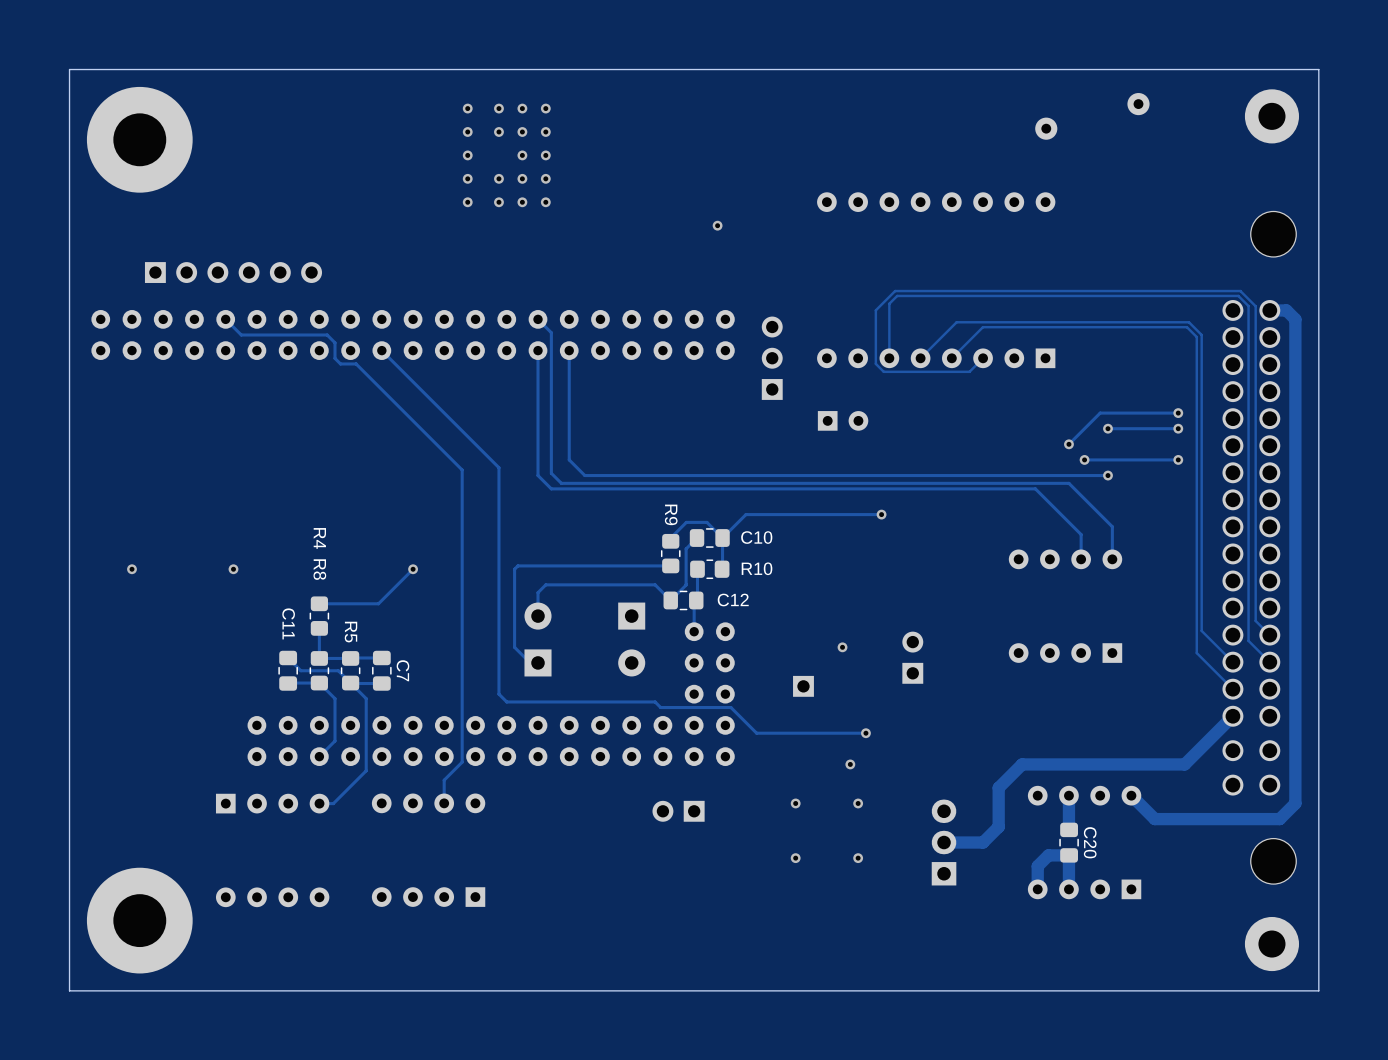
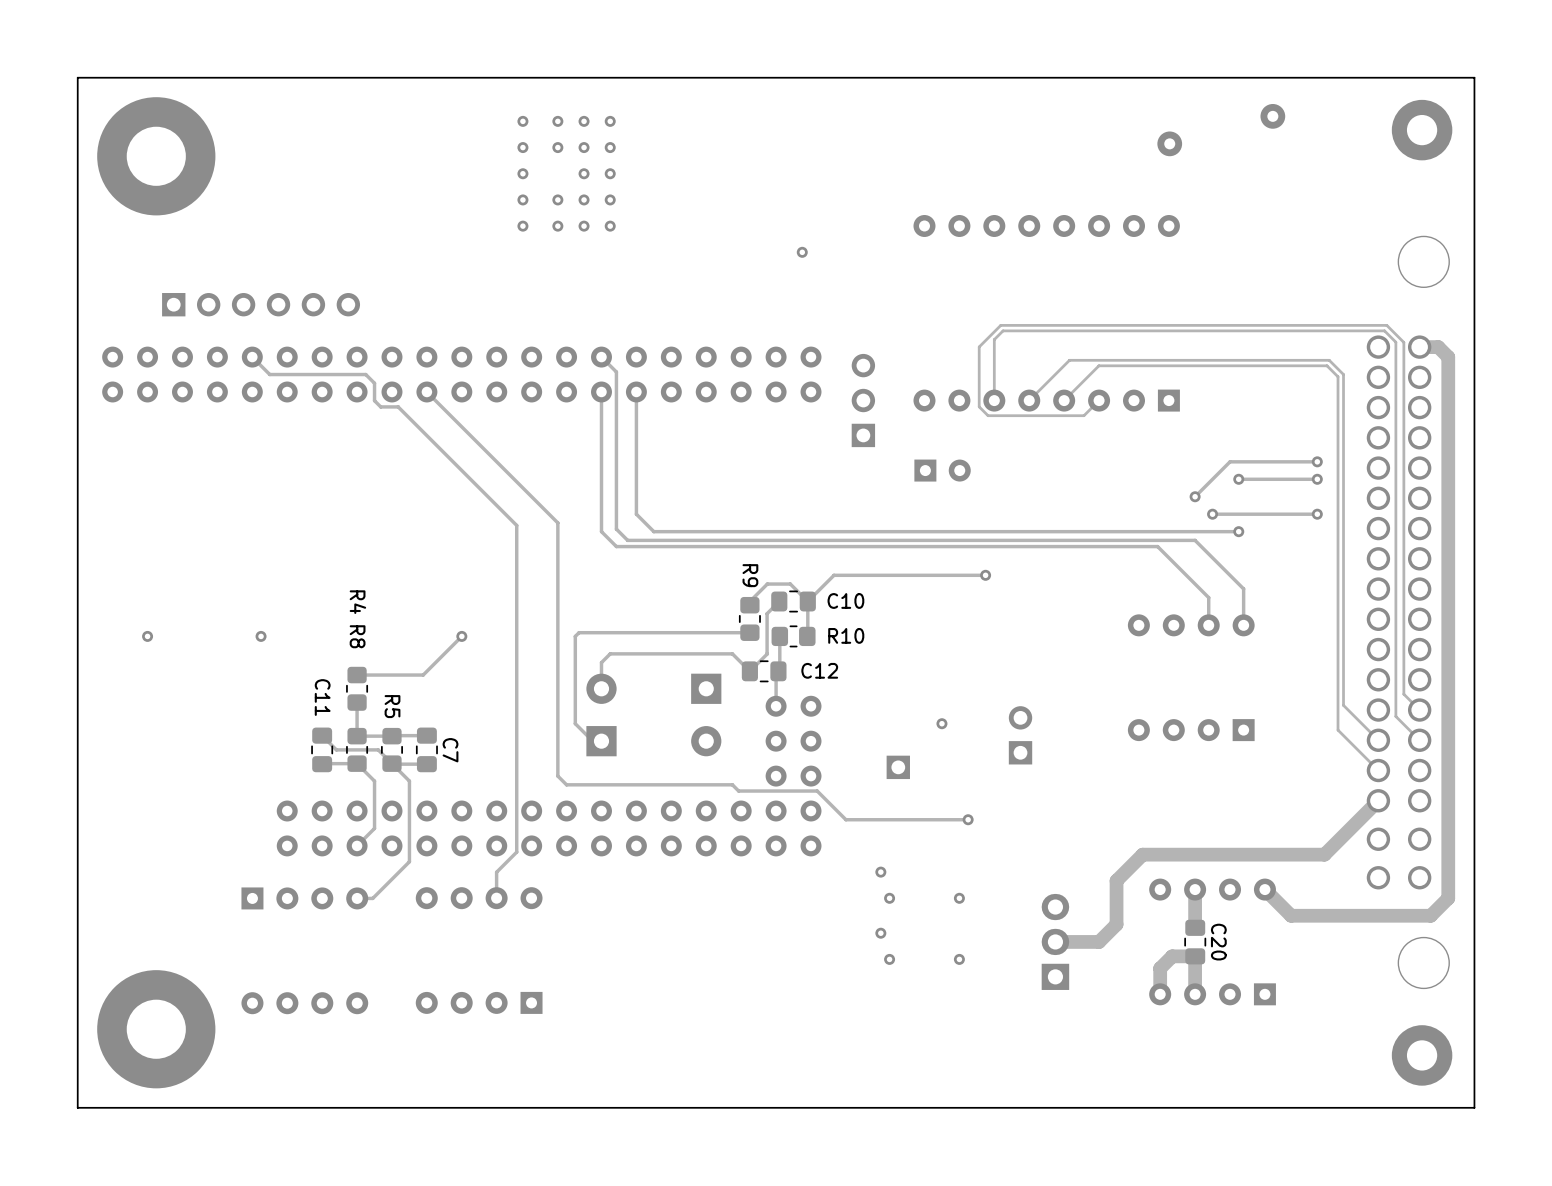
via: (850, 764) -> none
via: none -> (880, 872)
part: (678, 811) -> none
via: none -> (880, 933)

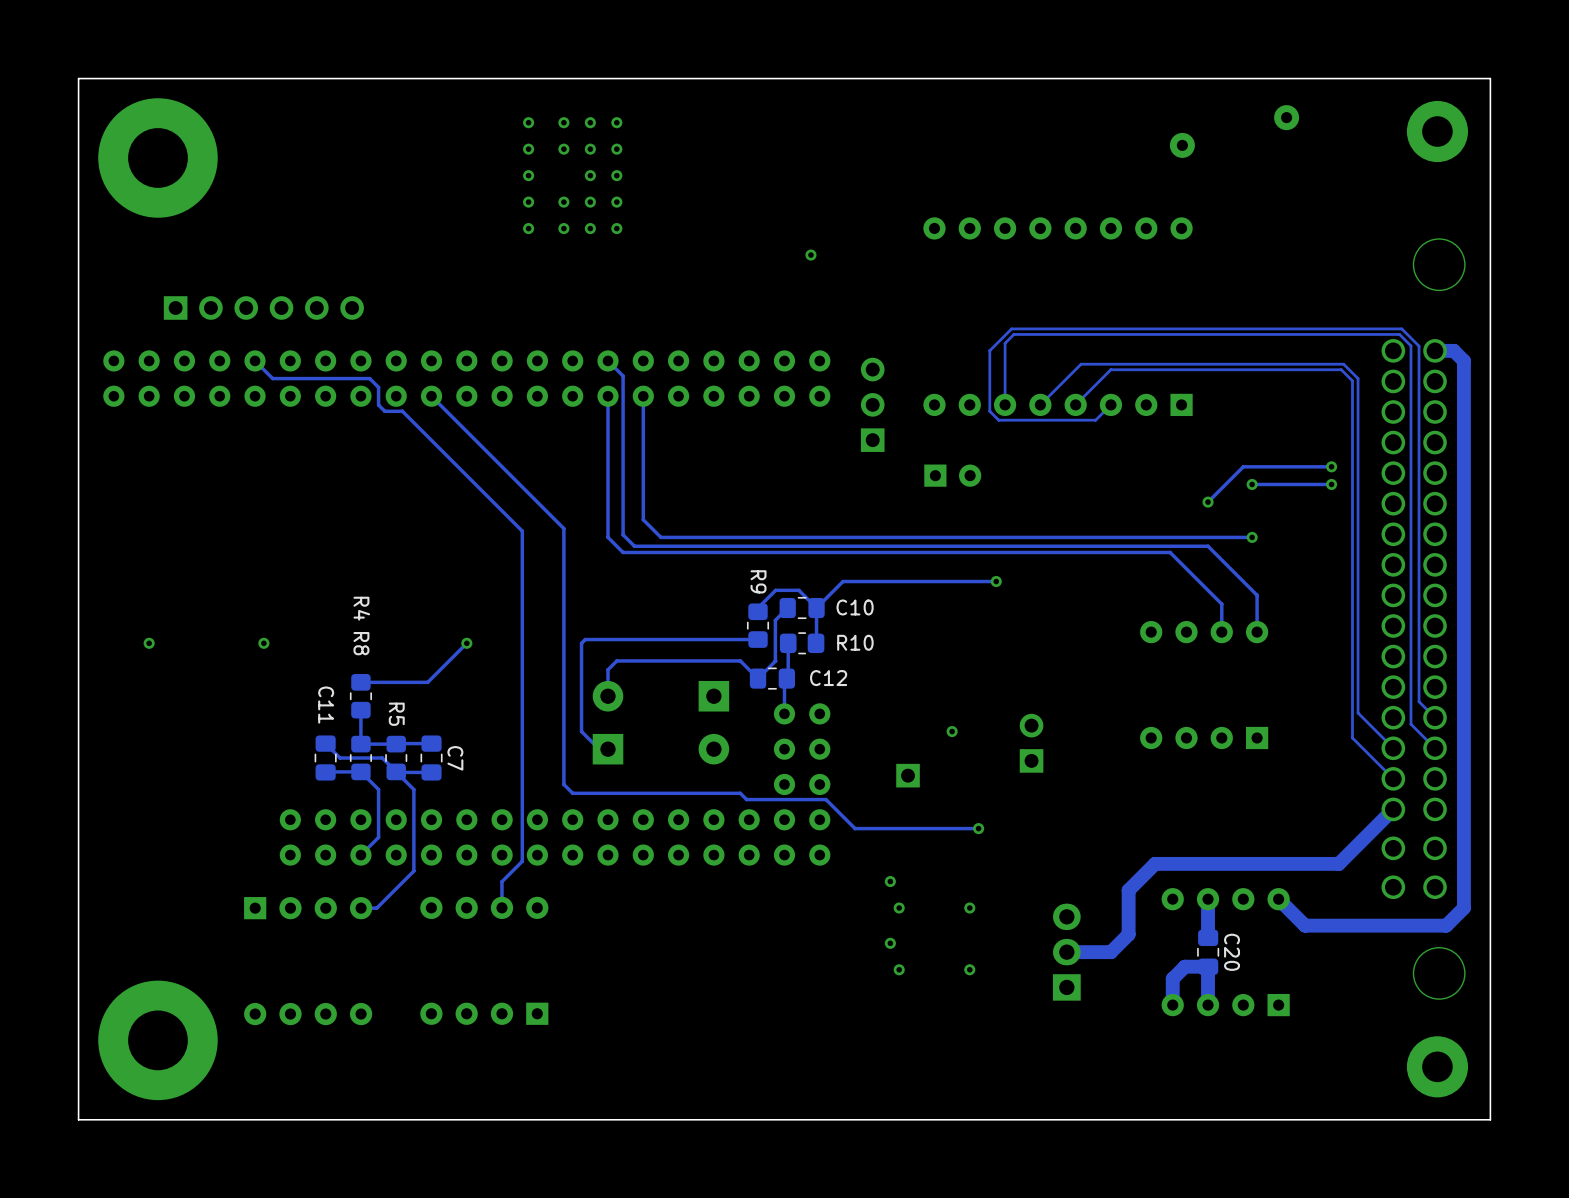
via: (1212, 514) -> none
track: (1317, 514) (1212, 514) -> none
via: (1317, 514) -> none

